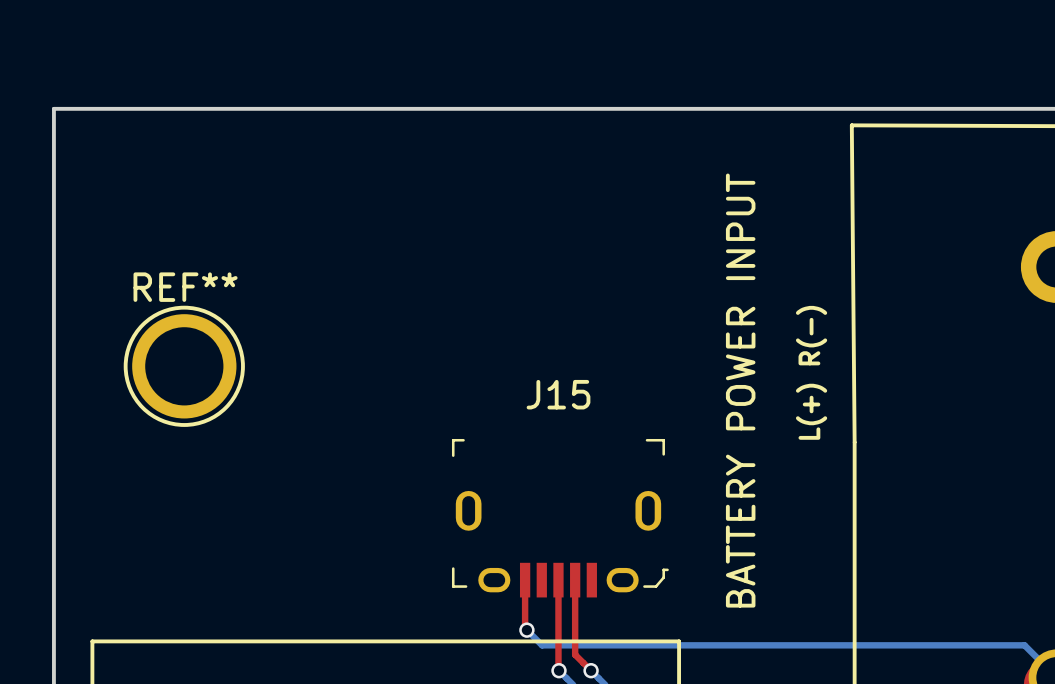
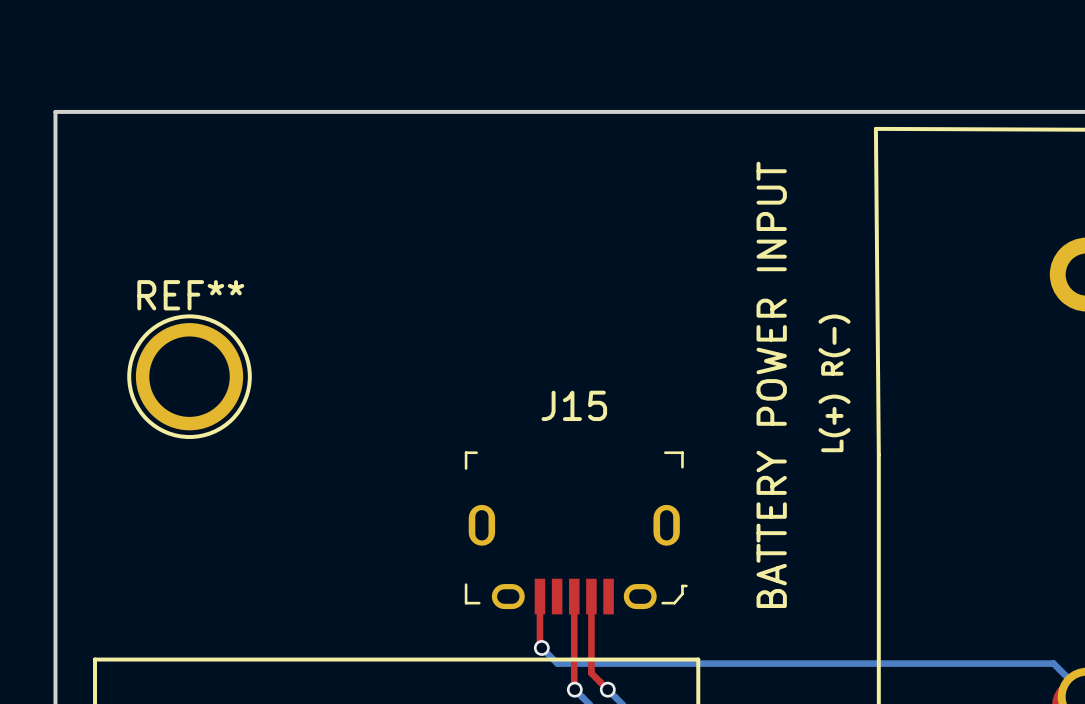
BATTERY POWER INPUT name position: BATTERY POWER INPUT (740, 390) -> BATTERY POWER INPUT (771, 384)

